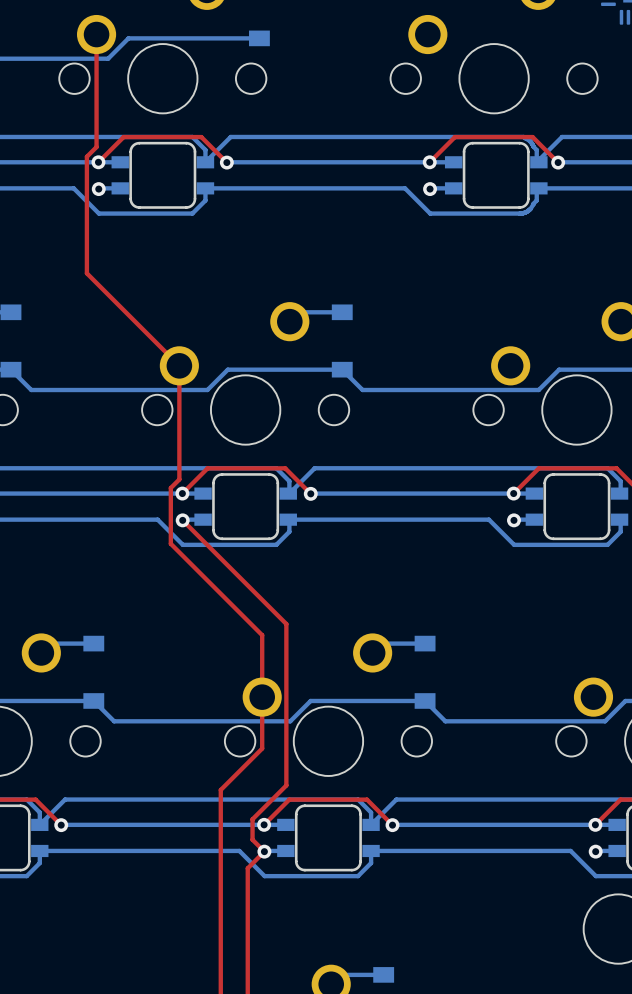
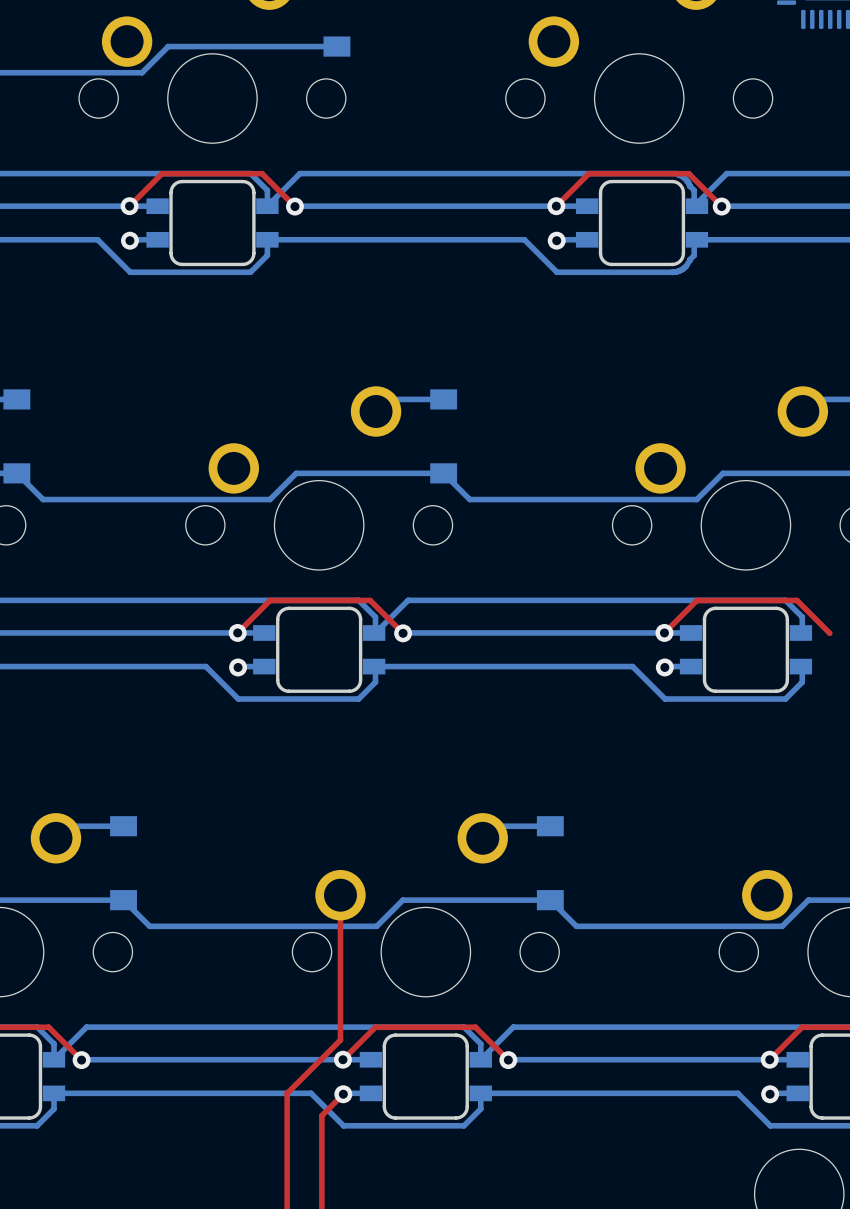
top track: (96, 34) (96, 147) (86, 156) (86, 273) (179, 365) (179, 479) (170, 488) (170, 543) (262, 635) (262, 697) -> none
top track: (182, 520) (286, 624) (286, 785) (262, 809) -> none
top track: (262, 748) (220, 789) (220, 851) -> (340, 961) (340, 1040)
top track: (252, 819) (252, 839) (264, 851) -> (328, 1052) (287, 1093)

